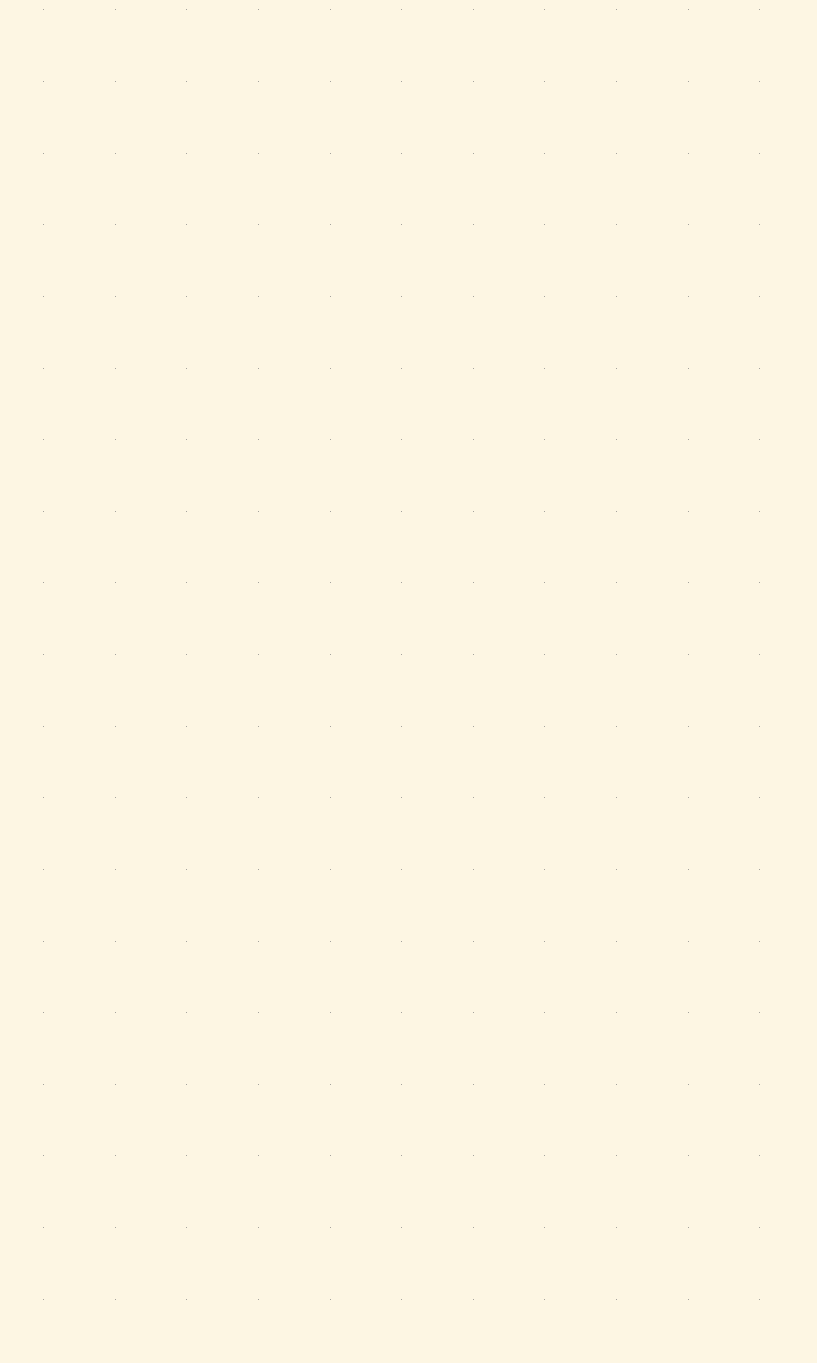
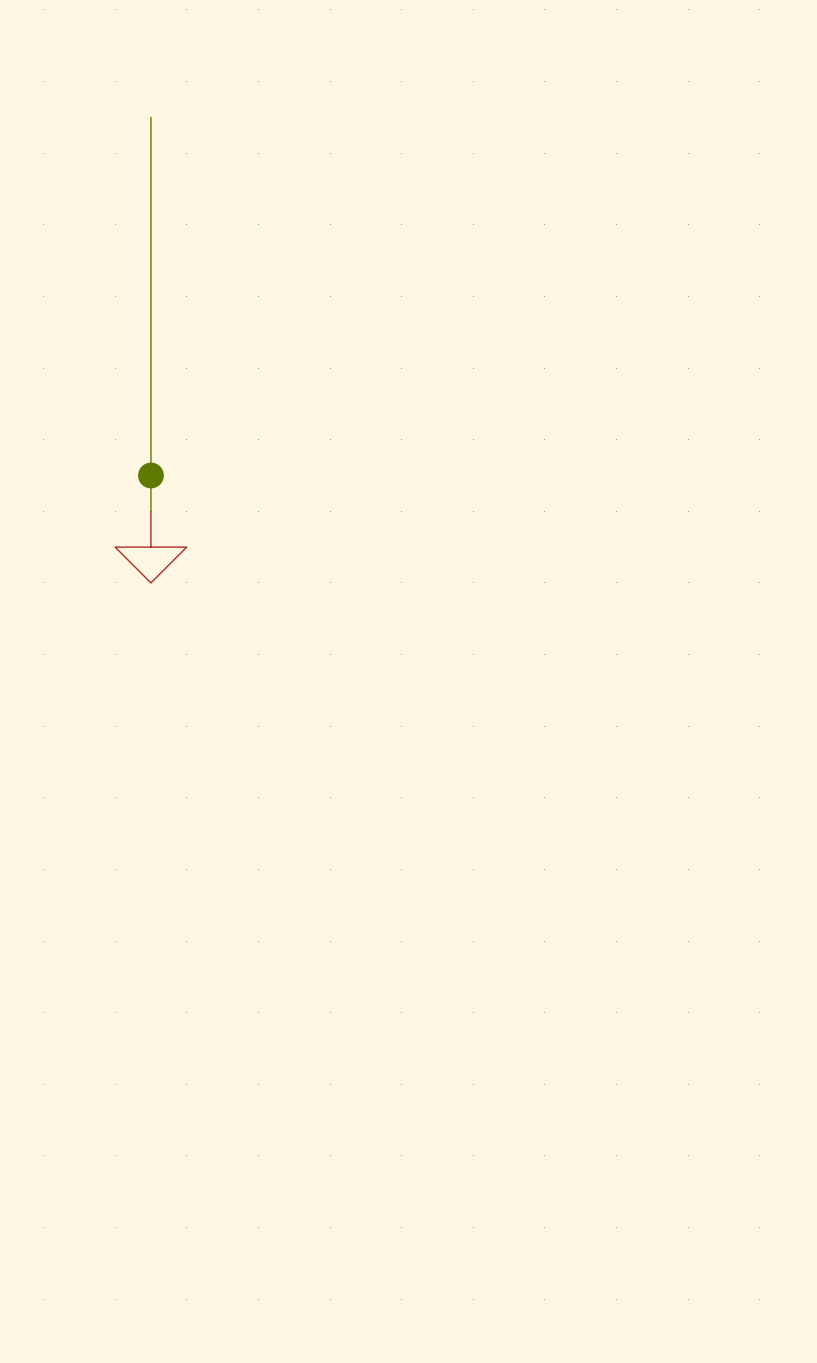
wire: none -> (150, 117) (150, 511)
junction: none -> (150, 475)
power symbol: none -> (150, 547)

